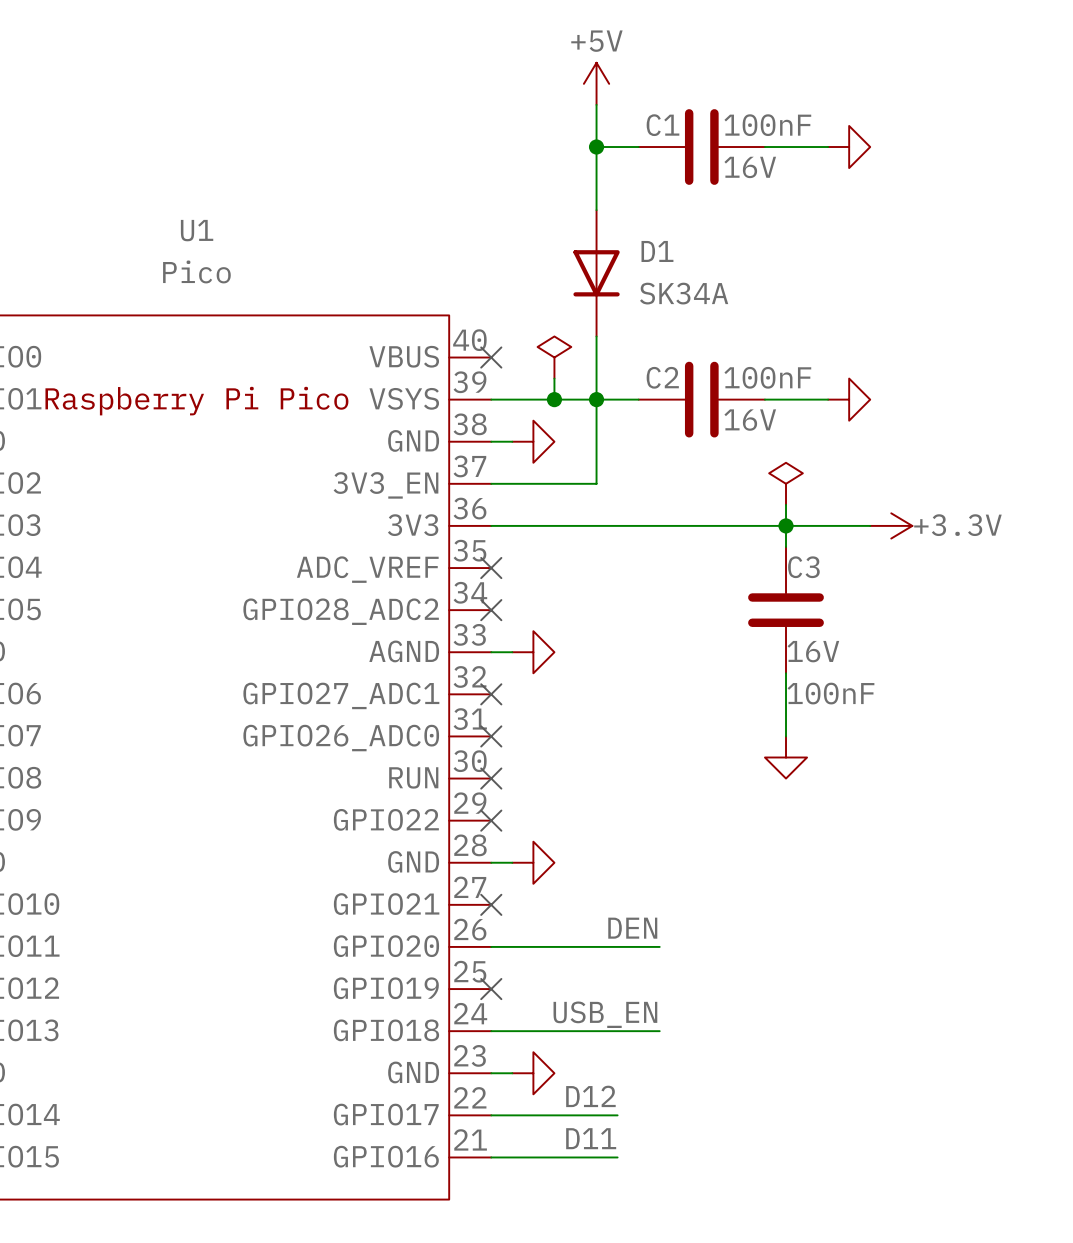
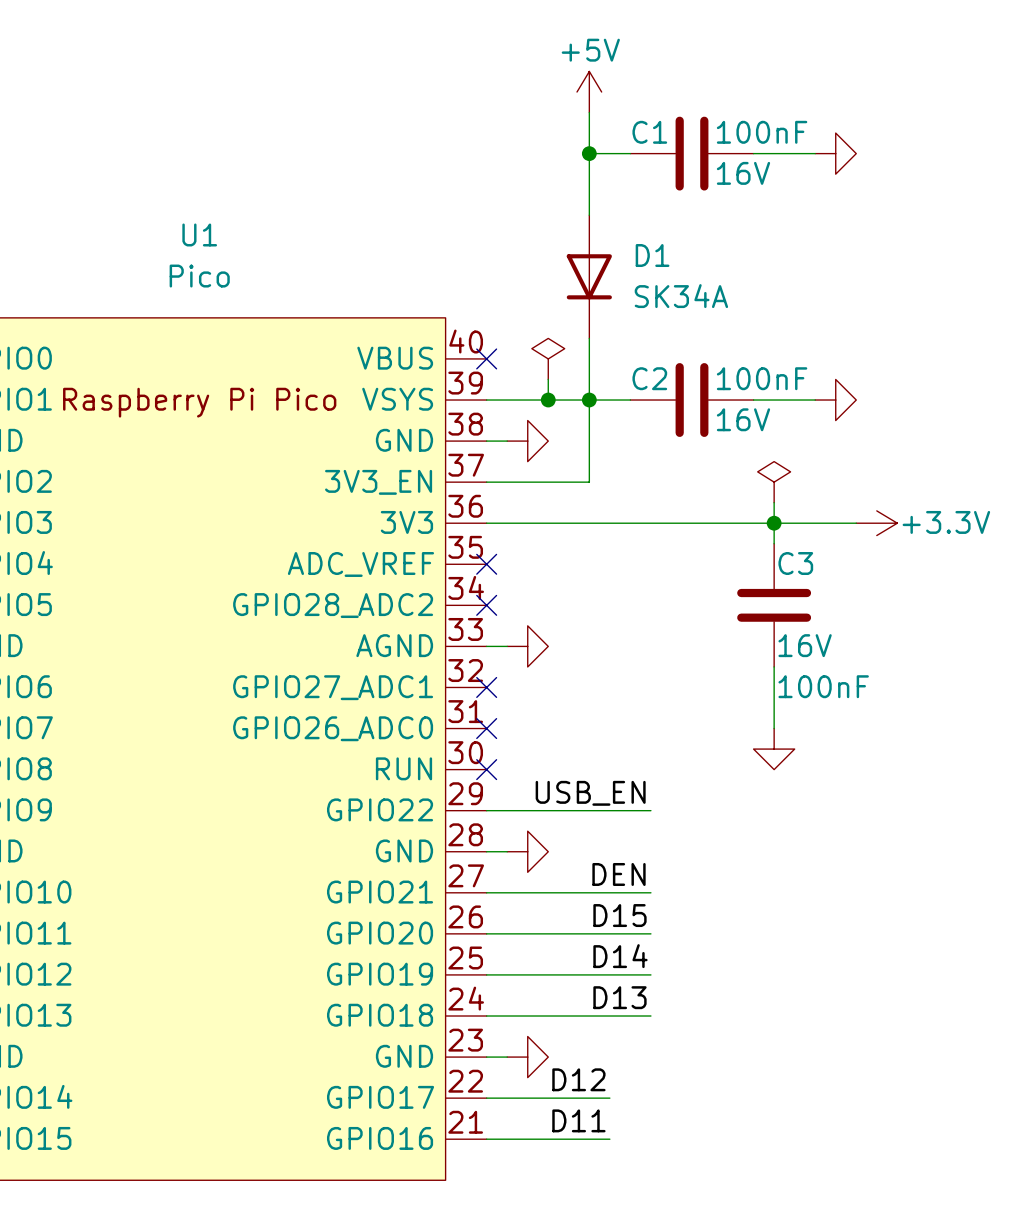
label: none -> USB_EN (590, 793)
wire: none -> (486, 810) (650, 810)
no-connect mark: (491, 820) -> none
label: none -> DEN (619, 874)
wire: none -> (486, 892) (650, 892)
no-connect mark: (491, 904) -> none
label: DEN (632, 928) -> D15 (619, 915)
label: none -> D14 (620, 956)
wire: none -> (486, 974) (650, 974)
no-connect mark: (491, 989) -> none
label: USB_EN (605, 1014) -> D13 (619, 997)

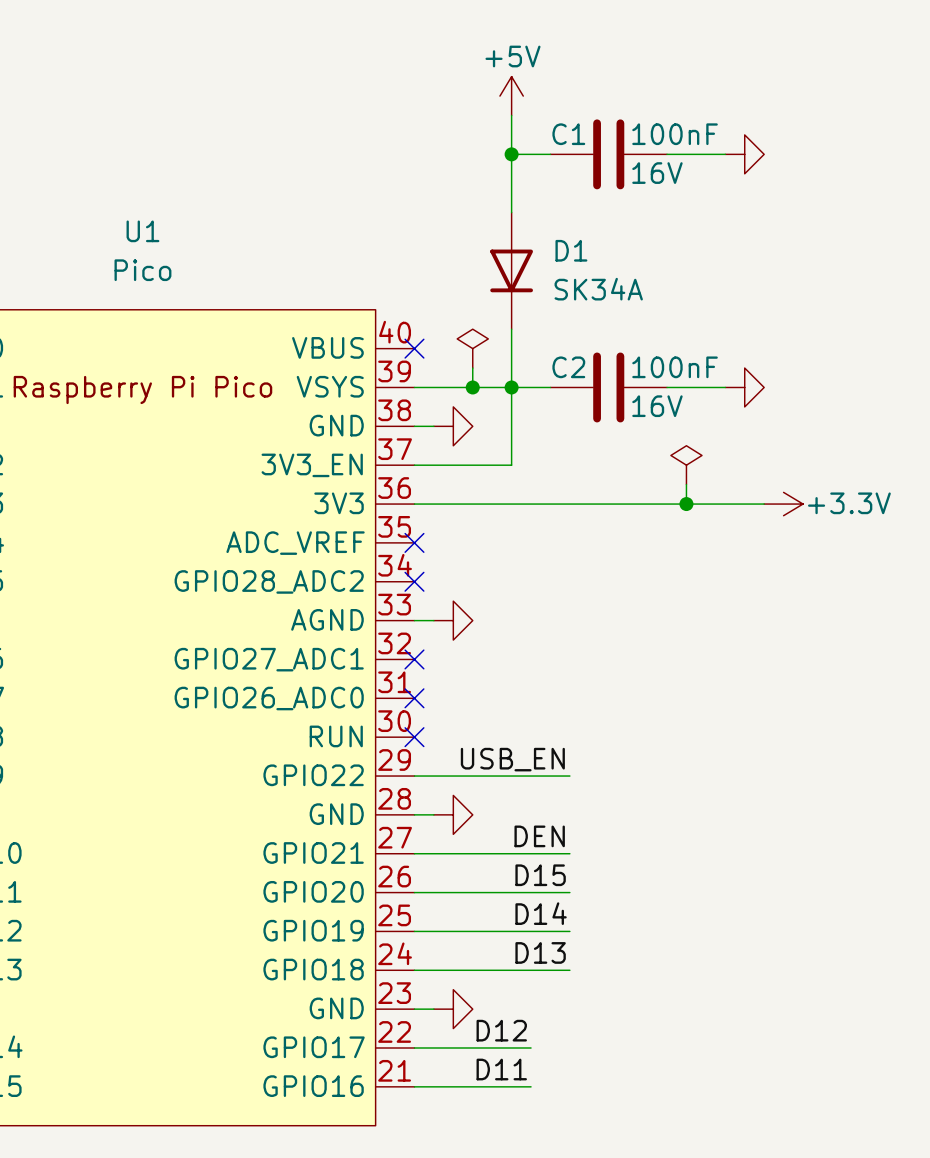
wire: (774, 523) (774, 543) -> none
C3: 100nF (774, 605) -> none
wire: (774, 666) (774, 728) -> none
power symbol: (774, 749) -> none

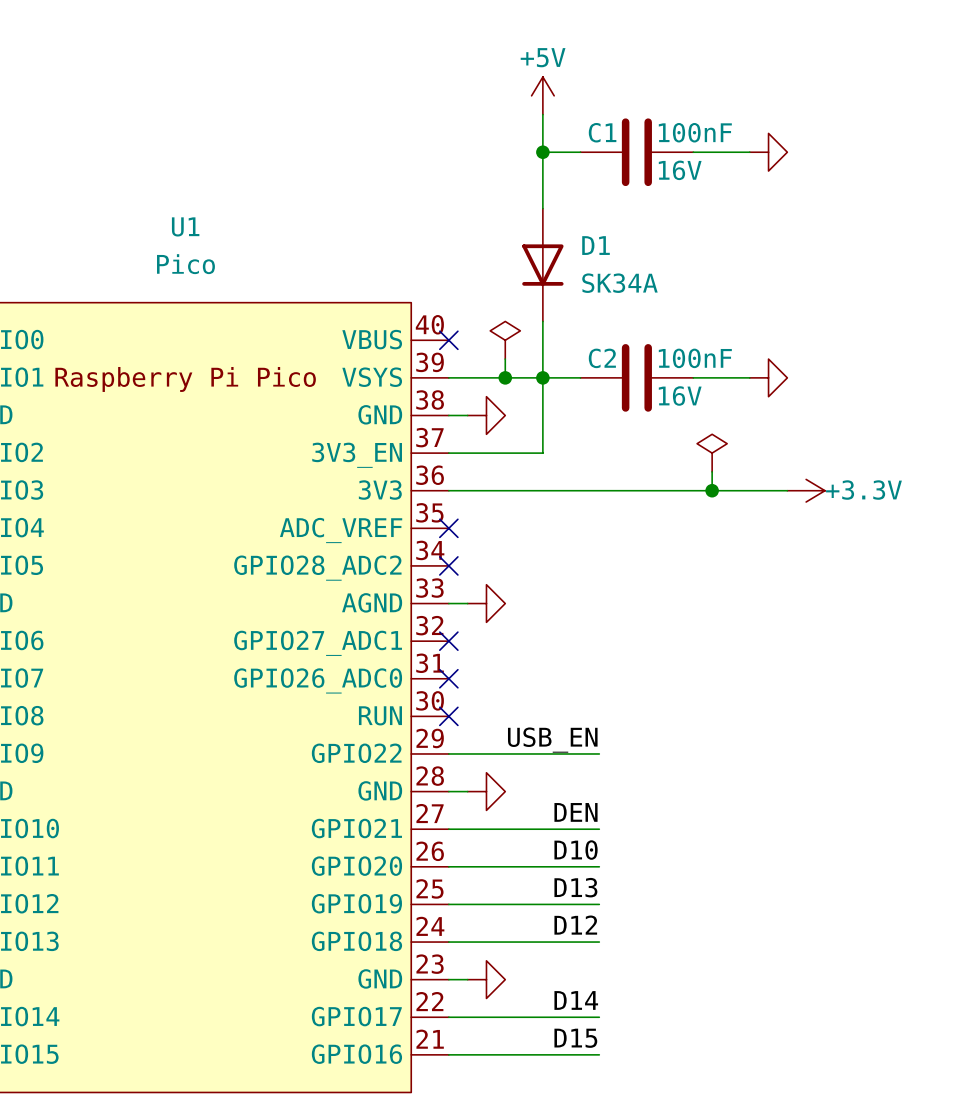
label: D15 (540, 875) -> D10 (576, 850)
label: D14 (541, 913) -> D13 (575, 887)
label: D13 (540, 952) -> D12 (575, 925)
label: D12 (501, 1030) -> none
label: none -> D14 (576, 1000)
wire: none -> (561, 1017) (599, 1017)
label: D11 (501, 1069) -> none
label: none -> D15 (575, 1038)
wire: none -> (561, 1054) (599, 1054)

